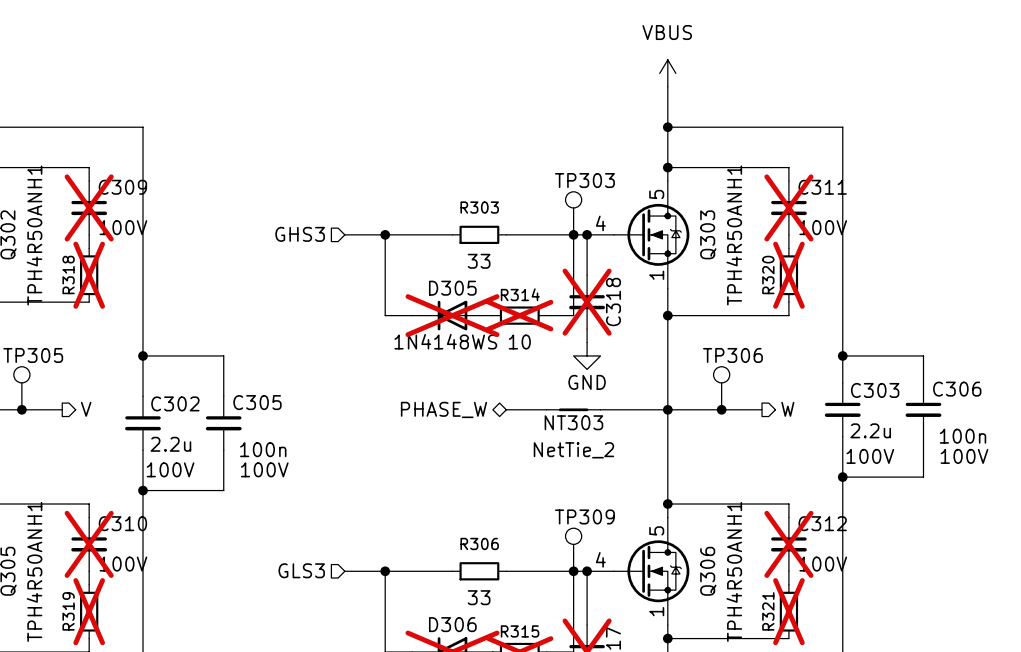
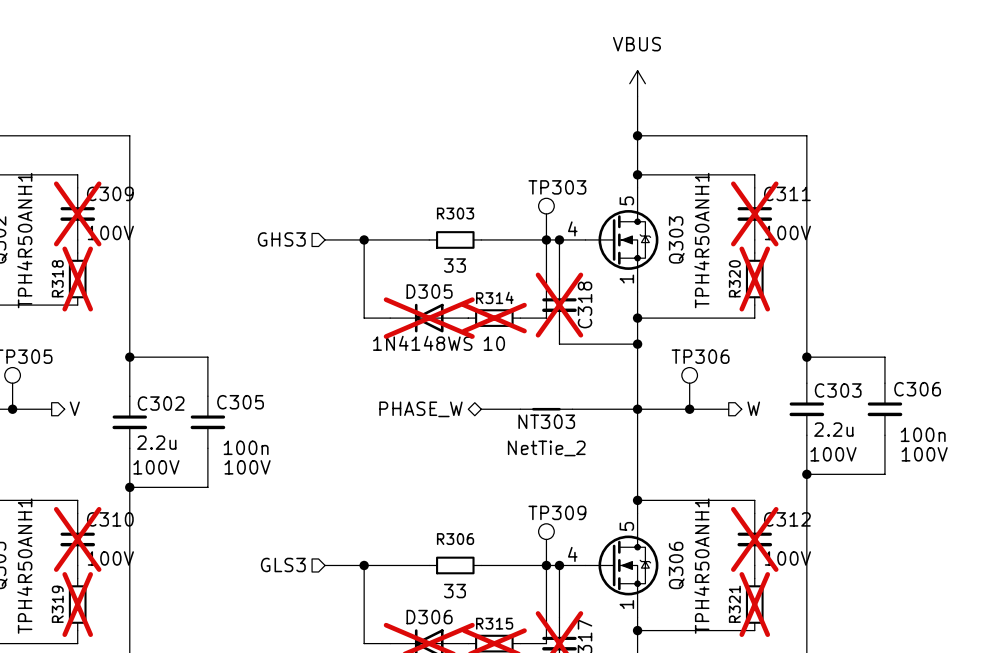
wire: none -> (559, 344) (637, 344)
junction: none -> (637, 344)
power symbol: GND (587, 355) -> none

